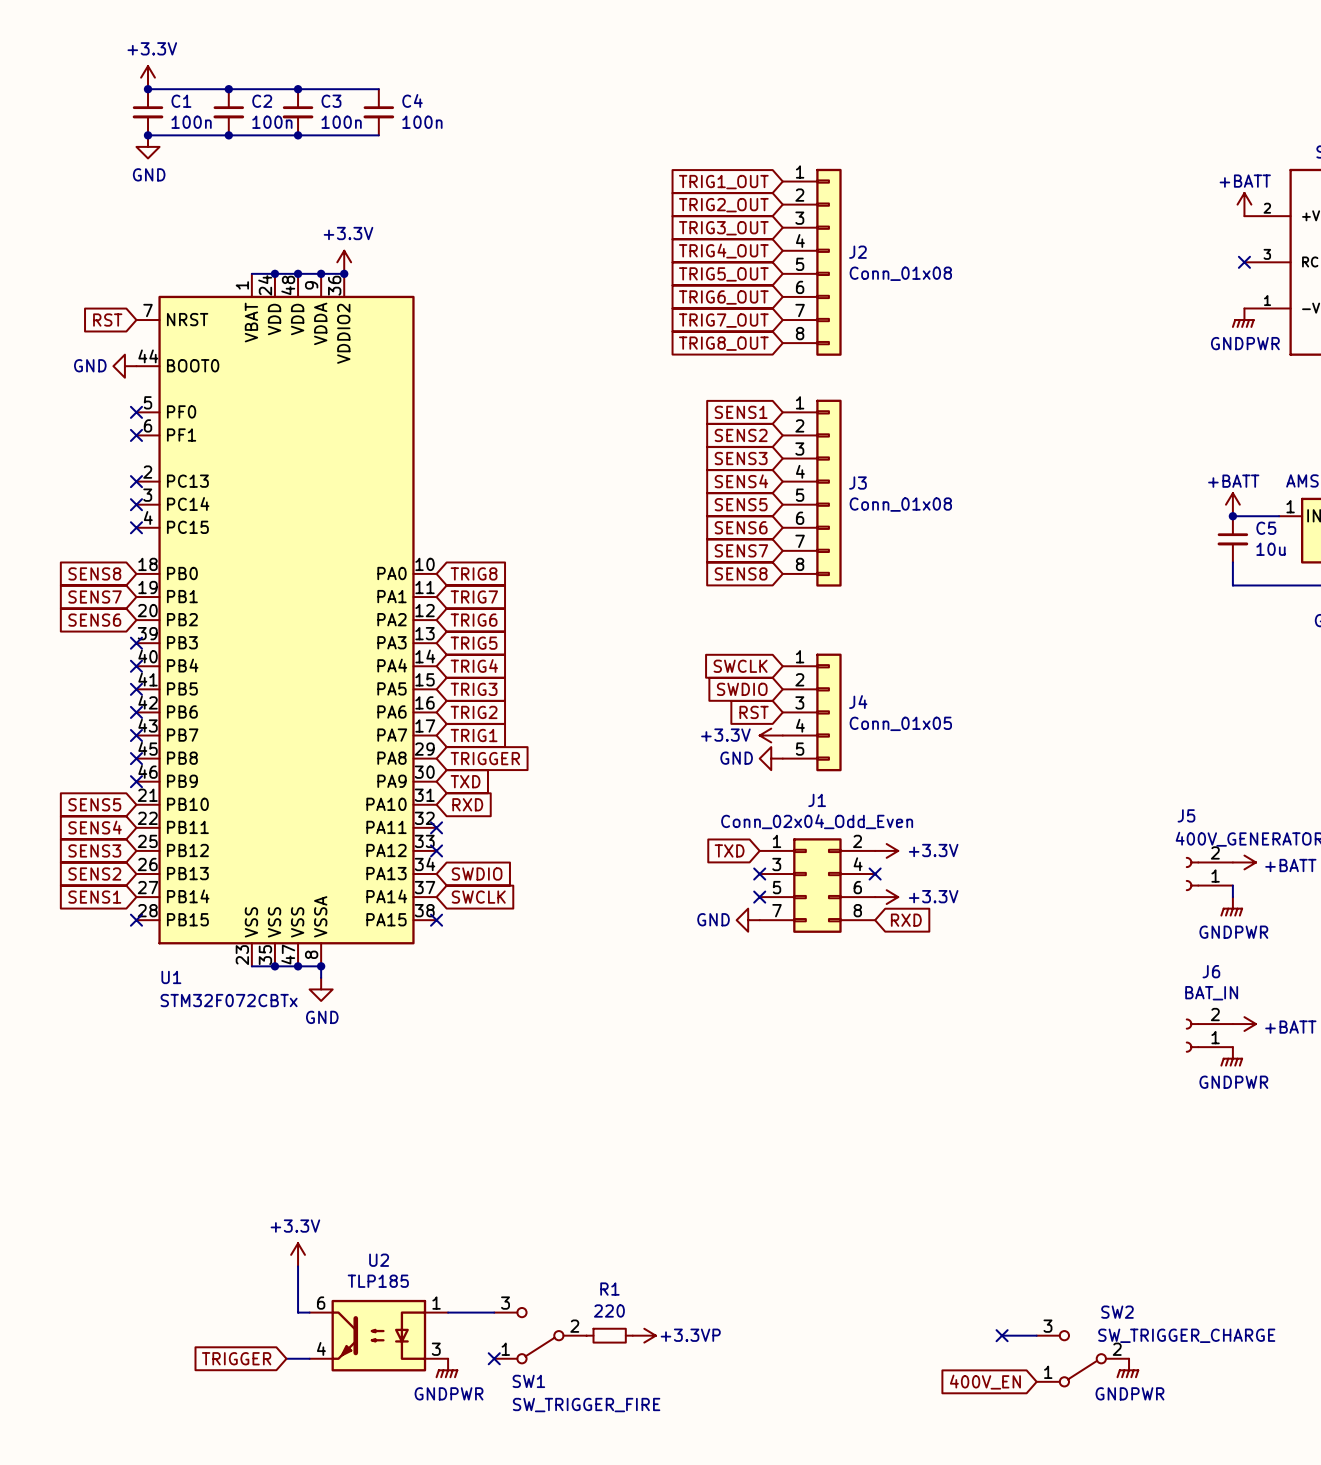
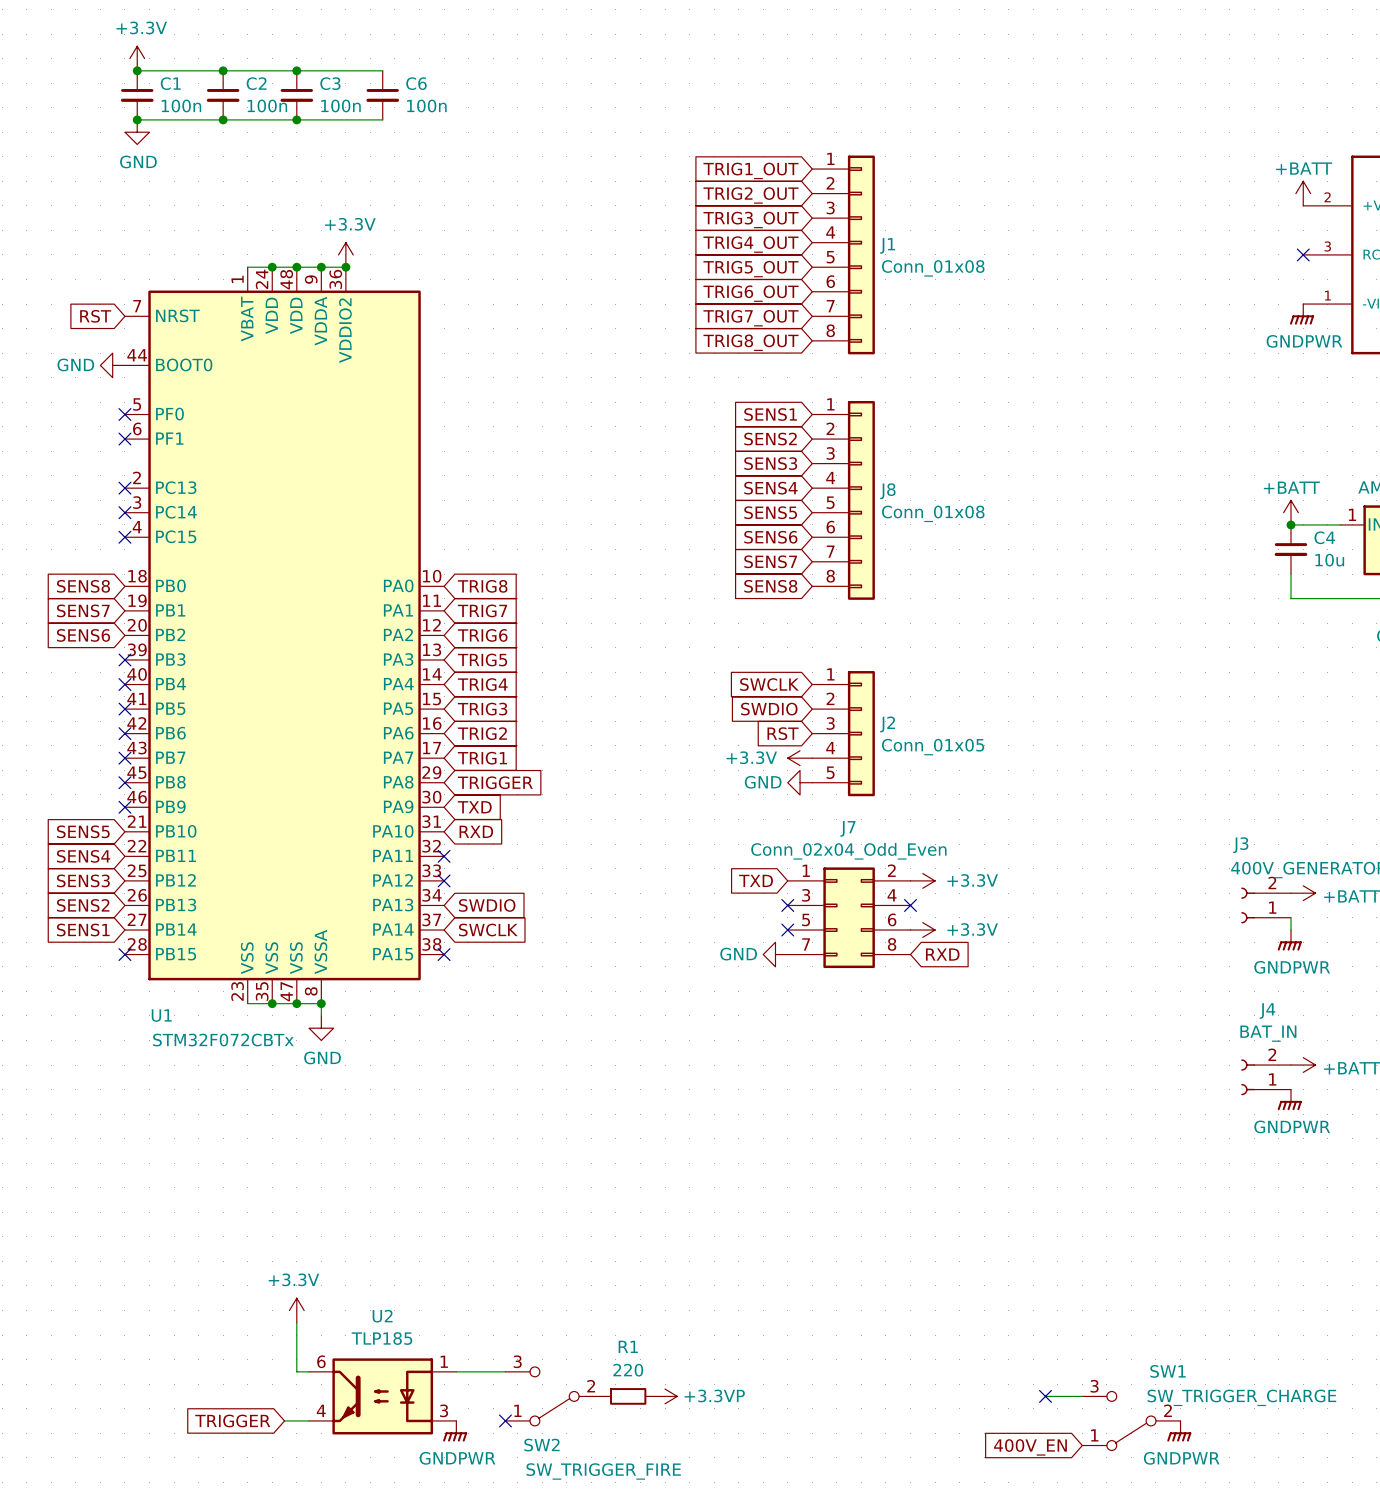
C4 name: C4 (412, 100) -> C6 (416, 83)
J2 name: J2 (857, 252) -> J1 (887, 245)
J3 name: J3 (857, 483) -> J8 (887, 491)
C5 name: C5 (1266, 528) -> C4 (1324, 537)
J4 name: J4 (858, 702) -> J2 (887, 724)
J1 name: J1 (817, 800) -> J7 (847, 828)
J5 name: J5 (1186, 815) -> J3 (1240, 845)
J6 name: J6 (1211, 971) -> J4 (1267, 1011)
SW2 name: SW2 (1117, 1312) -> SW1 (1168, 1371)
SW1 name: SW1 (528, 1381) -> SW2 (541, 1445)

